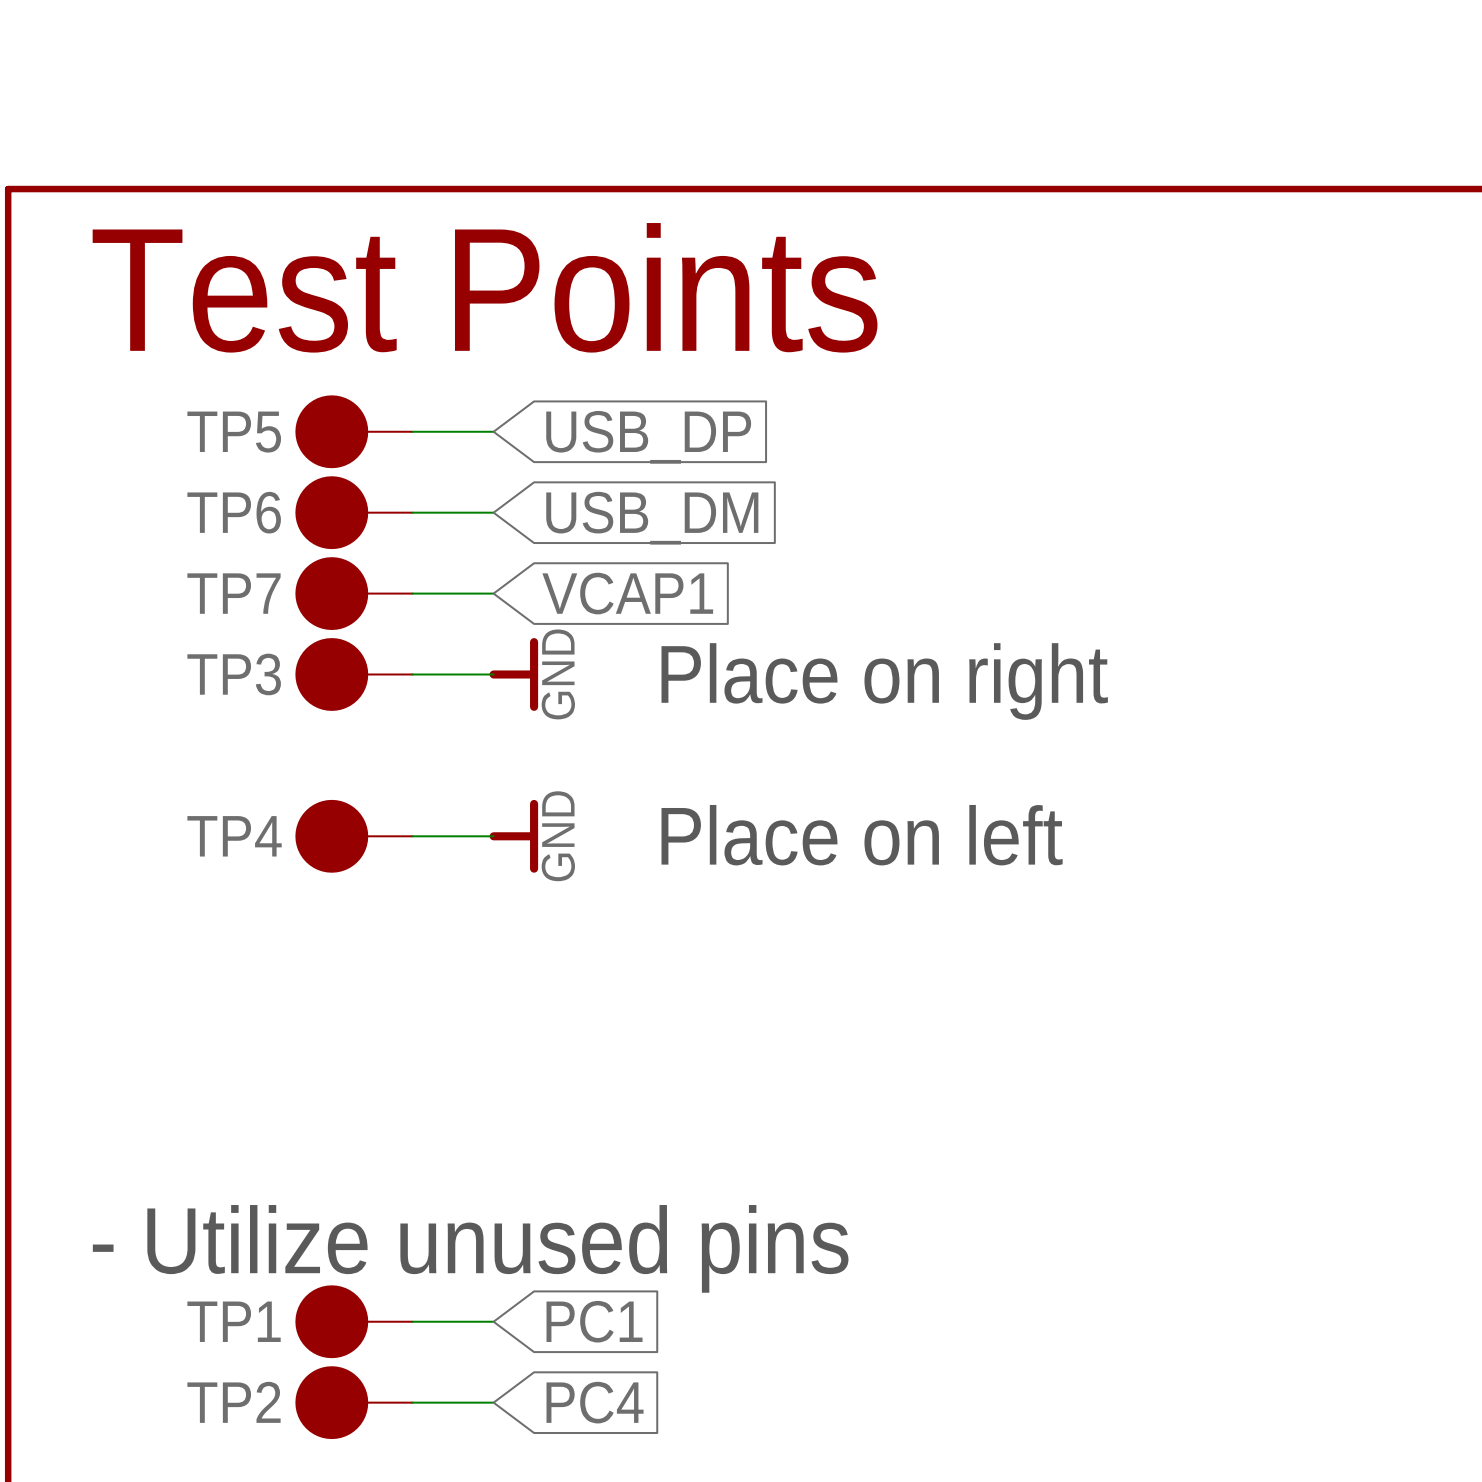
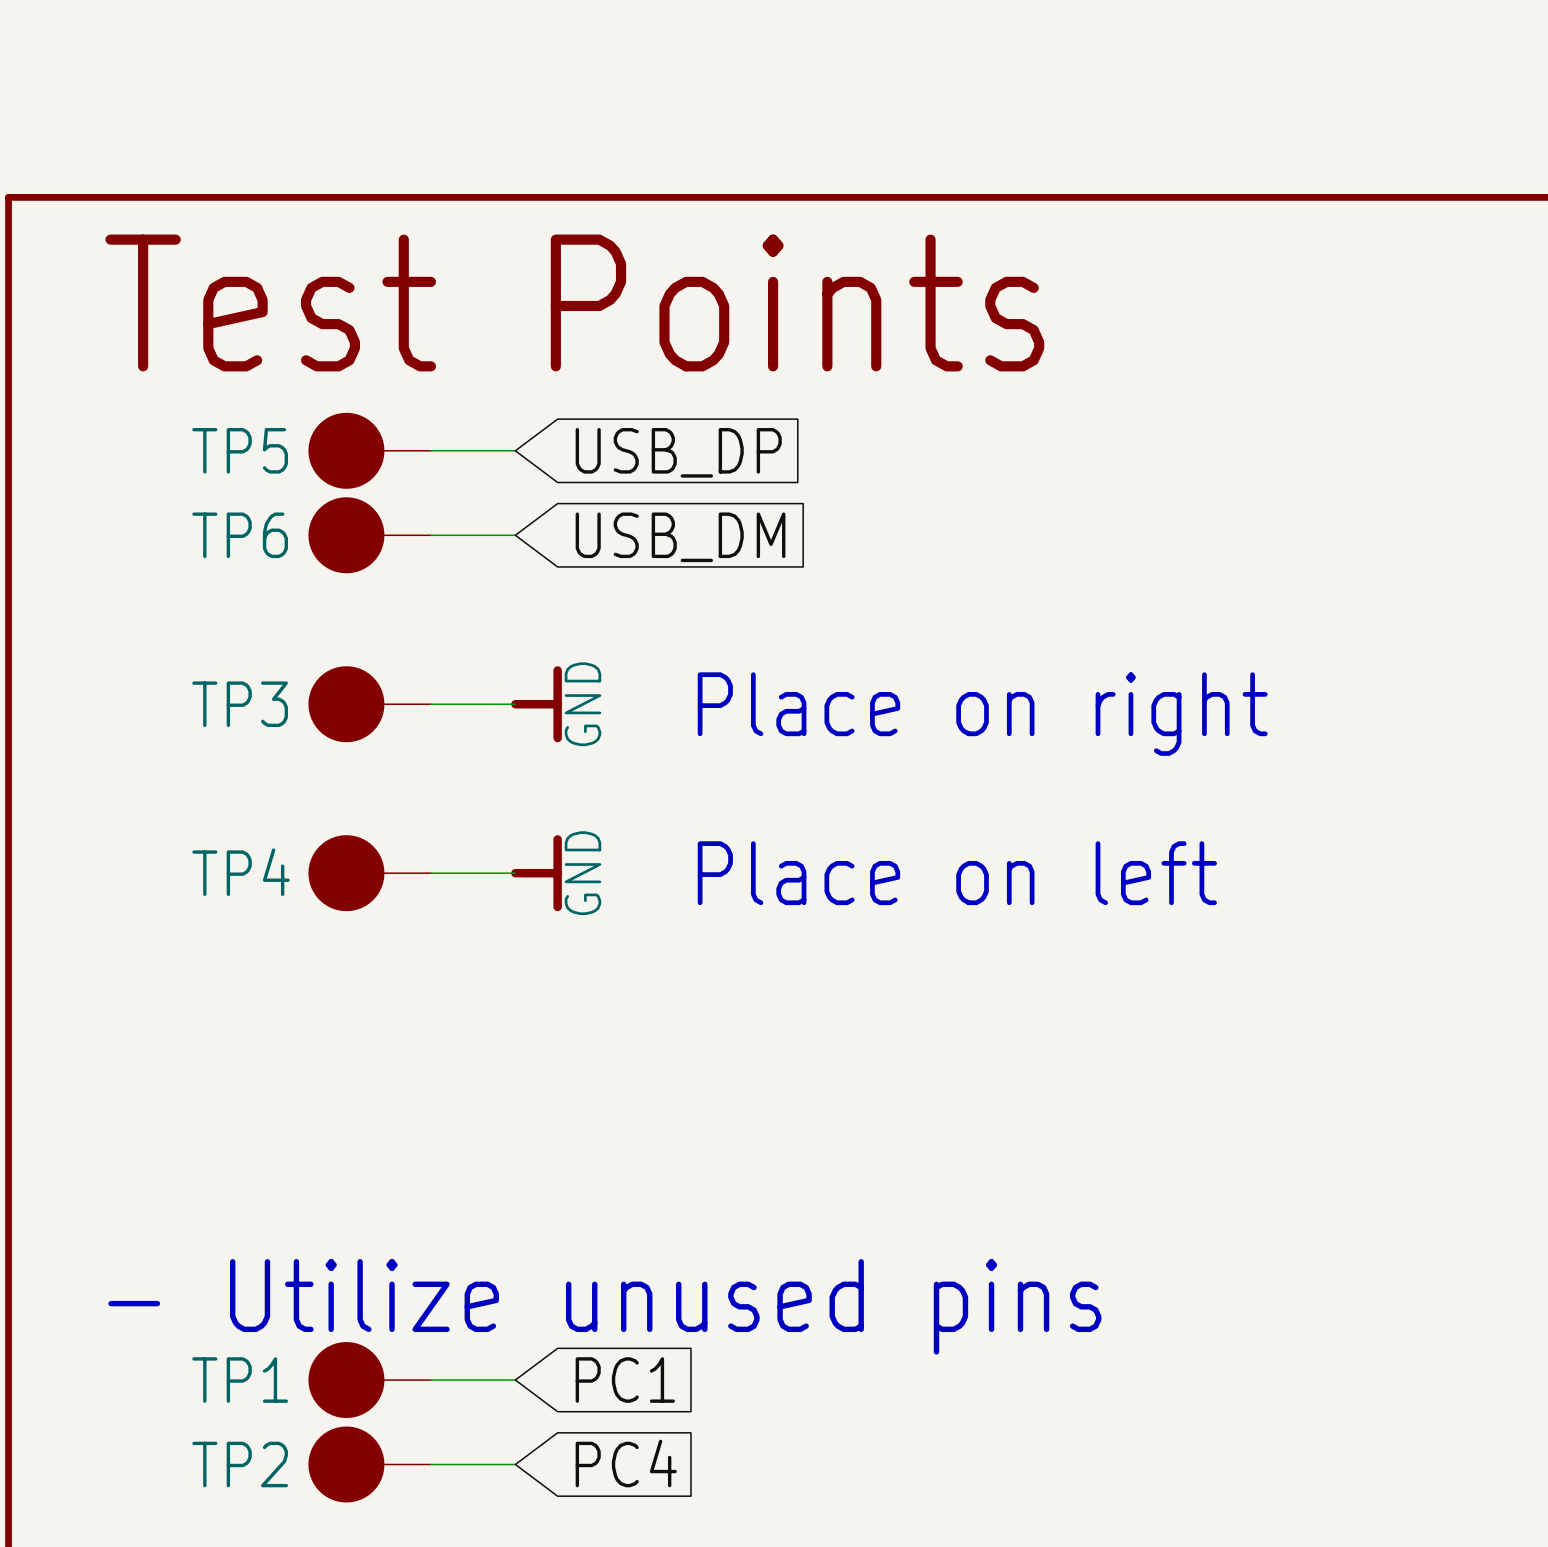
TP7: (354, 593) -> none
wire: (412, 593) (493, 593) -> none
global label: VCAP1 (627, 593) -> none

